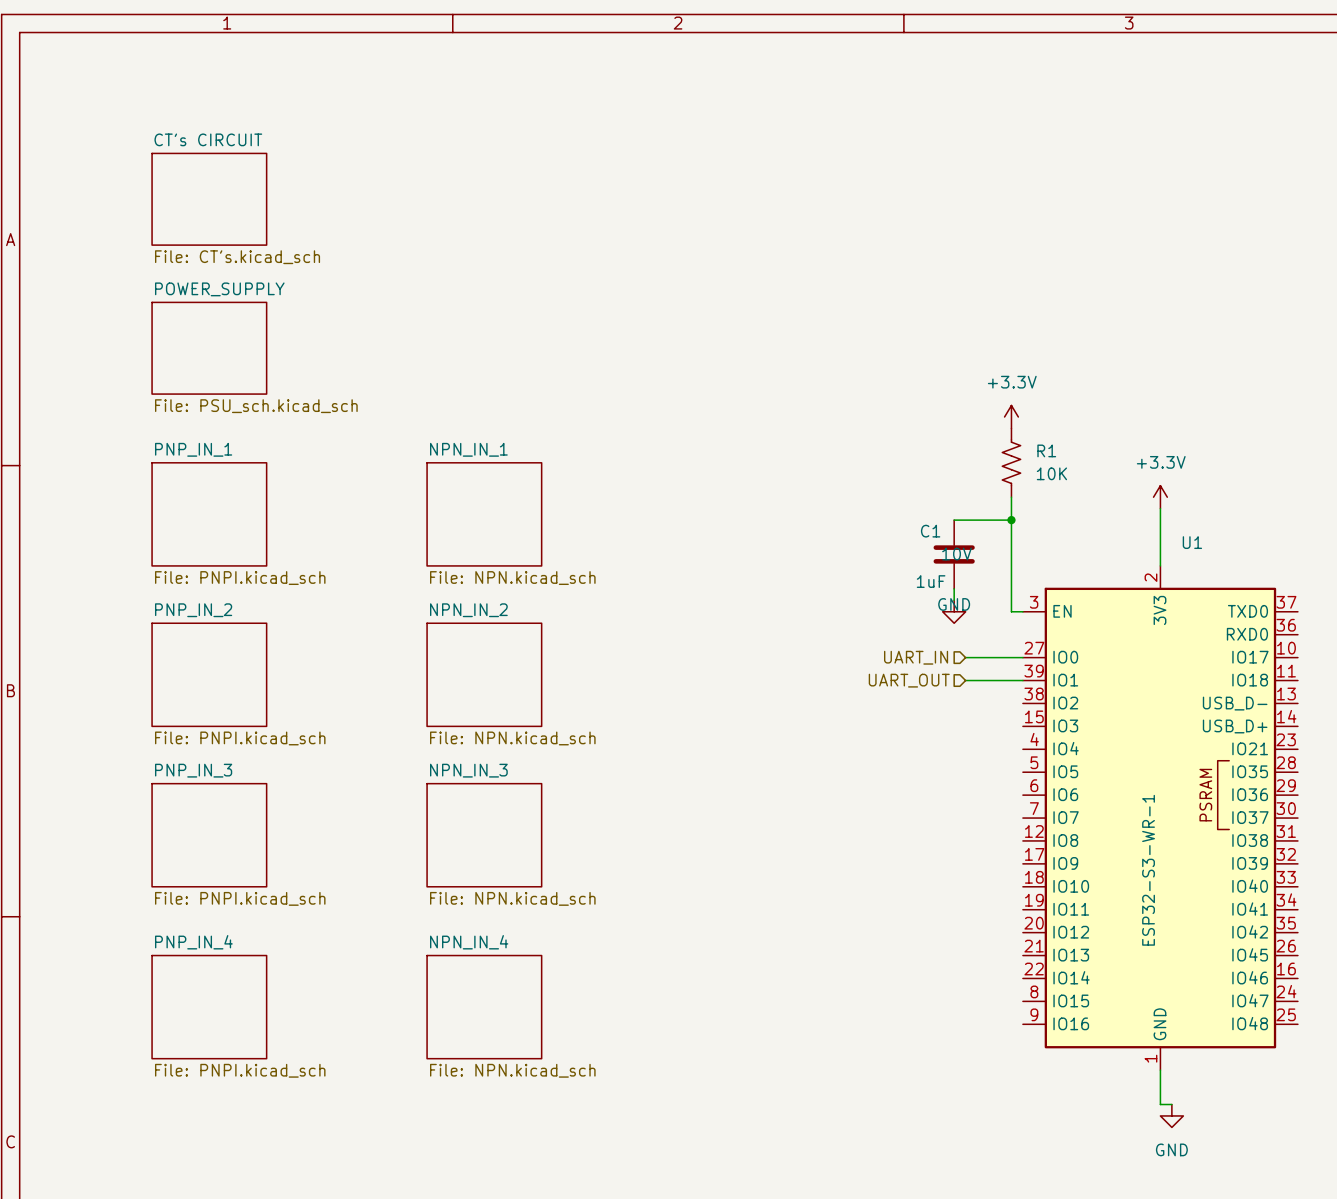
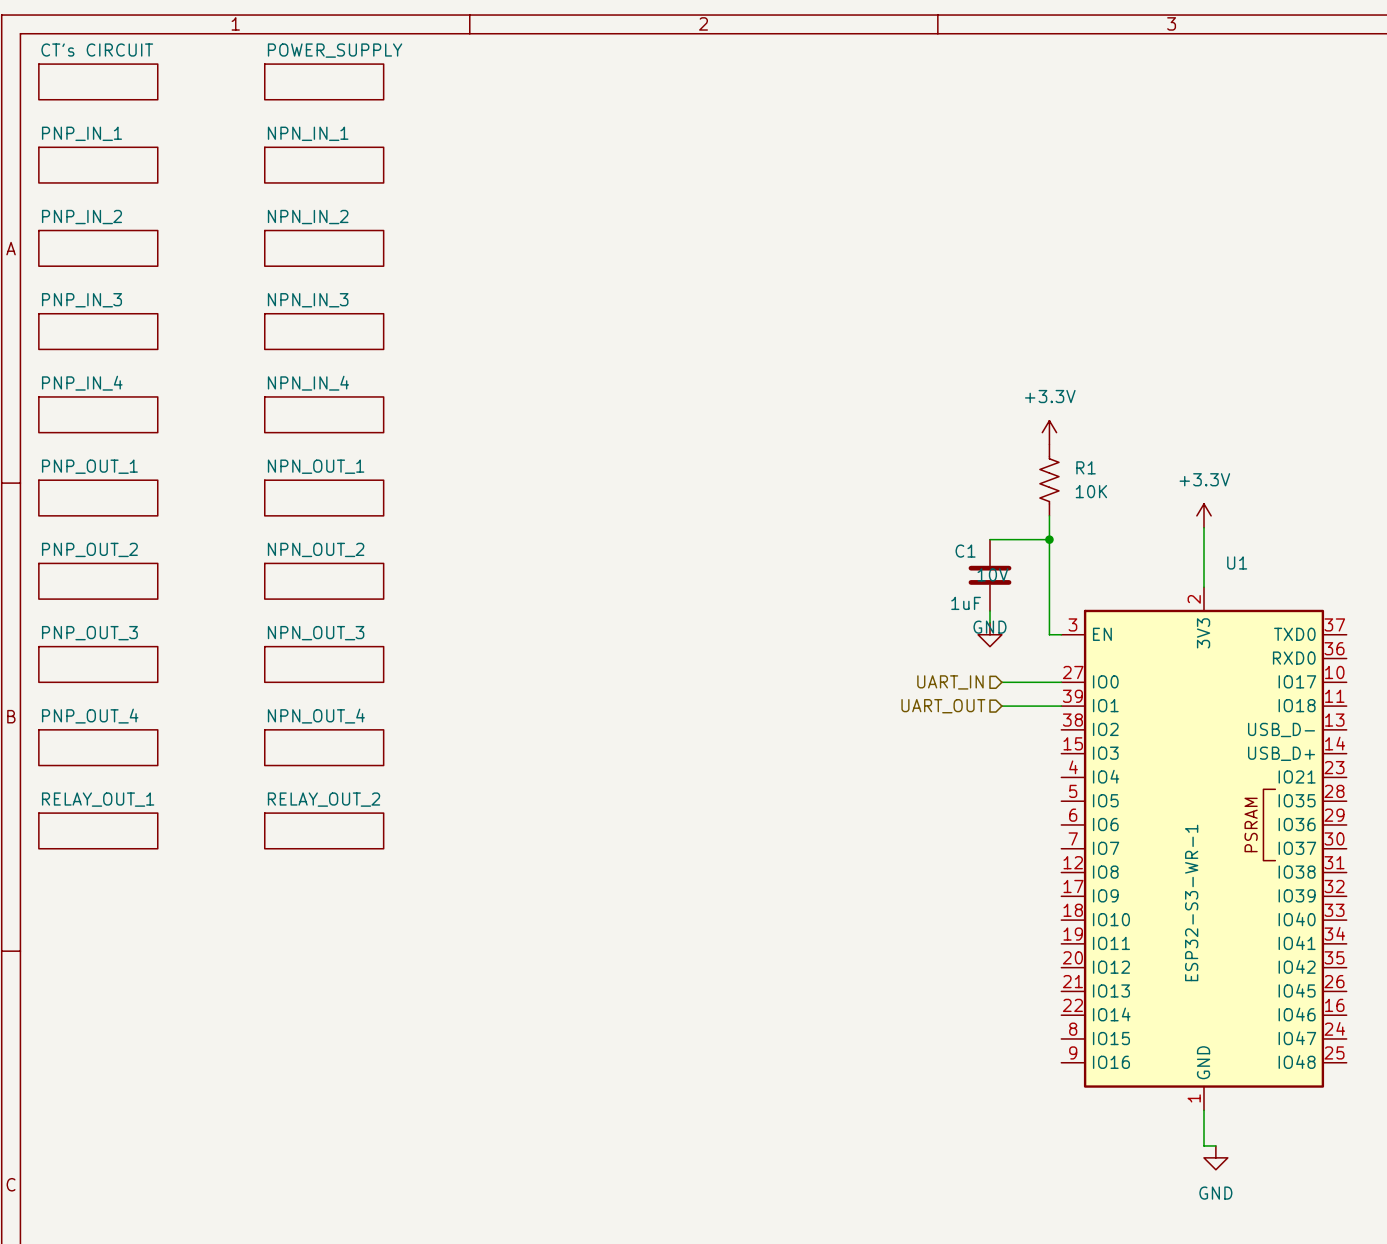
sheet CT's CIRCUIT: none -> (98, 81)
sheet POWER_SUPPLY: none -> (324, 81)
sheet CT's CIRCUIT: File: CT's.kicad_sch (209, 199) -> none
sheet POWER_SUPPLY: File: PSU_sch.kicad_sch (209, 348) -> none
sheet PNP_IN_1 name position: PNP_IN_1 (193, 449) -> PNP_IN_1 (81, 133)
sheet NPN_IN_1 name position: NPN_IN_1 (468, 449) -> NPN_IN_1 (308, 133)
sheet PNP_IN_1 shape: [151, 462, 268, 567] -> [38, 146, 159, 184]
sheet NPN_IN_1 shape: [426, 462, 543, 567] -> [264, 146, 385, 184]
sheet PNP_OUT_1: none -> (98, 498)
sheet NPN_OUT_1: none -> (324, 498)
sheet PNP_OUT_2: none -> (98, 581)
sheet NPN_OUT_2: none -> (324, 581)
sheet PNP_IN_1 value: File: PNPI.kicad_sch (240, 578) -> none
sheet NPN_IN_1 value: File: NPN.kicad_sch (512, 578) -> none
sheet PNP_IN_2 name position: PNP_IN_2 (193, 610) -> PNP_IN_2 (81, 217)
sheet NPN_IN_2 name position: NPN_IN_2 (468, 610) -> NPN_IN_2 (308, 217)
sheet PNP_IN_2 shape: [151, 622, 268, 728] -> [38, 229, 159, 267]
sheet NPN_IN_2 shape: [426, 622, 543, 728] -> [264, 229, 385, 267]
sheet PNP_OUT_3: none -> (98, 664)
sheet NPN_OUT_3: none -> (324, 664)
sheet PNP_OUT_4: none -> (98, 747)
sheet NPN_OUT_4: none -> (324, 747)
sheet PNP_IN_2 value: File: PNPI.kicad_sch (240, 738) -> none
sheet NPN_IN_2 value: File: NPN.kicad_sch (512, 738) -> none
sheet PNP_IN_3 name position: PNP_IN_3 (193, 770) -> PNP_IN_3 (81, 300)
sheet NPN_IN_3 name position: NPN_IN_3 (468, 770) -> NPN_IN_3 (308, 300)
sheet PNP_IN_3 shape: [151, 782, 268, 888] -> [38, 313, 159, 351]
sheet NPN_IN_3 shape: [426, 782, 543, 888] -> [264, 313, 385, 351]
sheet RELAY_OUT_1: none -> (98, 830)
sheet RELAY_OUT_2: none -> (324, 830)
sheet PNP_IN_3 value: File: PNPI.kicad_sch (240, 898) -> none
sheet NPN_IN_3 value: File: NPN.kicad_sch (512, 898) -> none
sheet PNP_IN_4 name position: PNP_IN_4 (193, 942) -> PNP_IN_4 (82, 383)
sheet NPN_IN_4 name position: NPN_IN_4 (469, 942) -> NPN_IN_4 (308, 383)
sheet PNP_IN_4 shape: [151, 954, 268, 1060] -> [38, 396, 159, 434]
sheet NPN_IN_4 shape: [426, 954, 543, 1060] -> [264, 396, 385, 434]
sheet PNP_IN_4 value: File: PNPI.kicad_sch (240, 1070) -> none
sheet NPN_IN_4 value: File: NPN.kicad_sch (512, 1070) -> none

